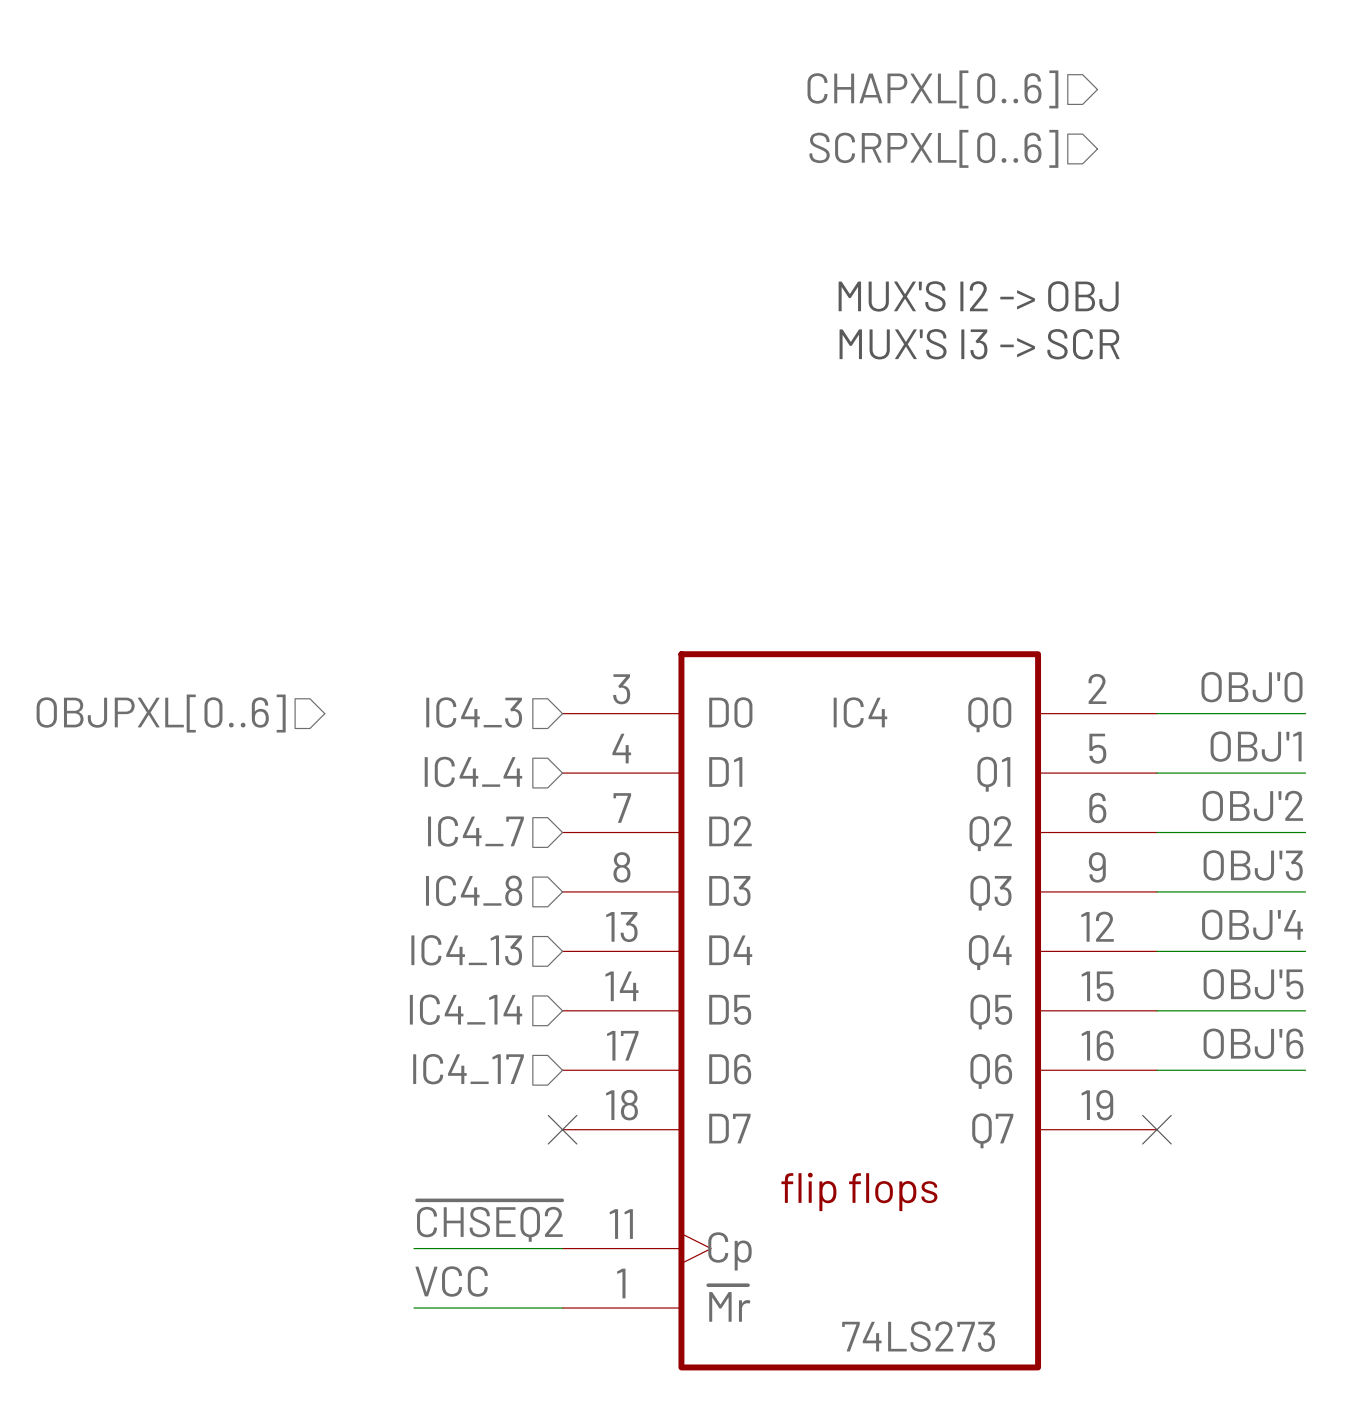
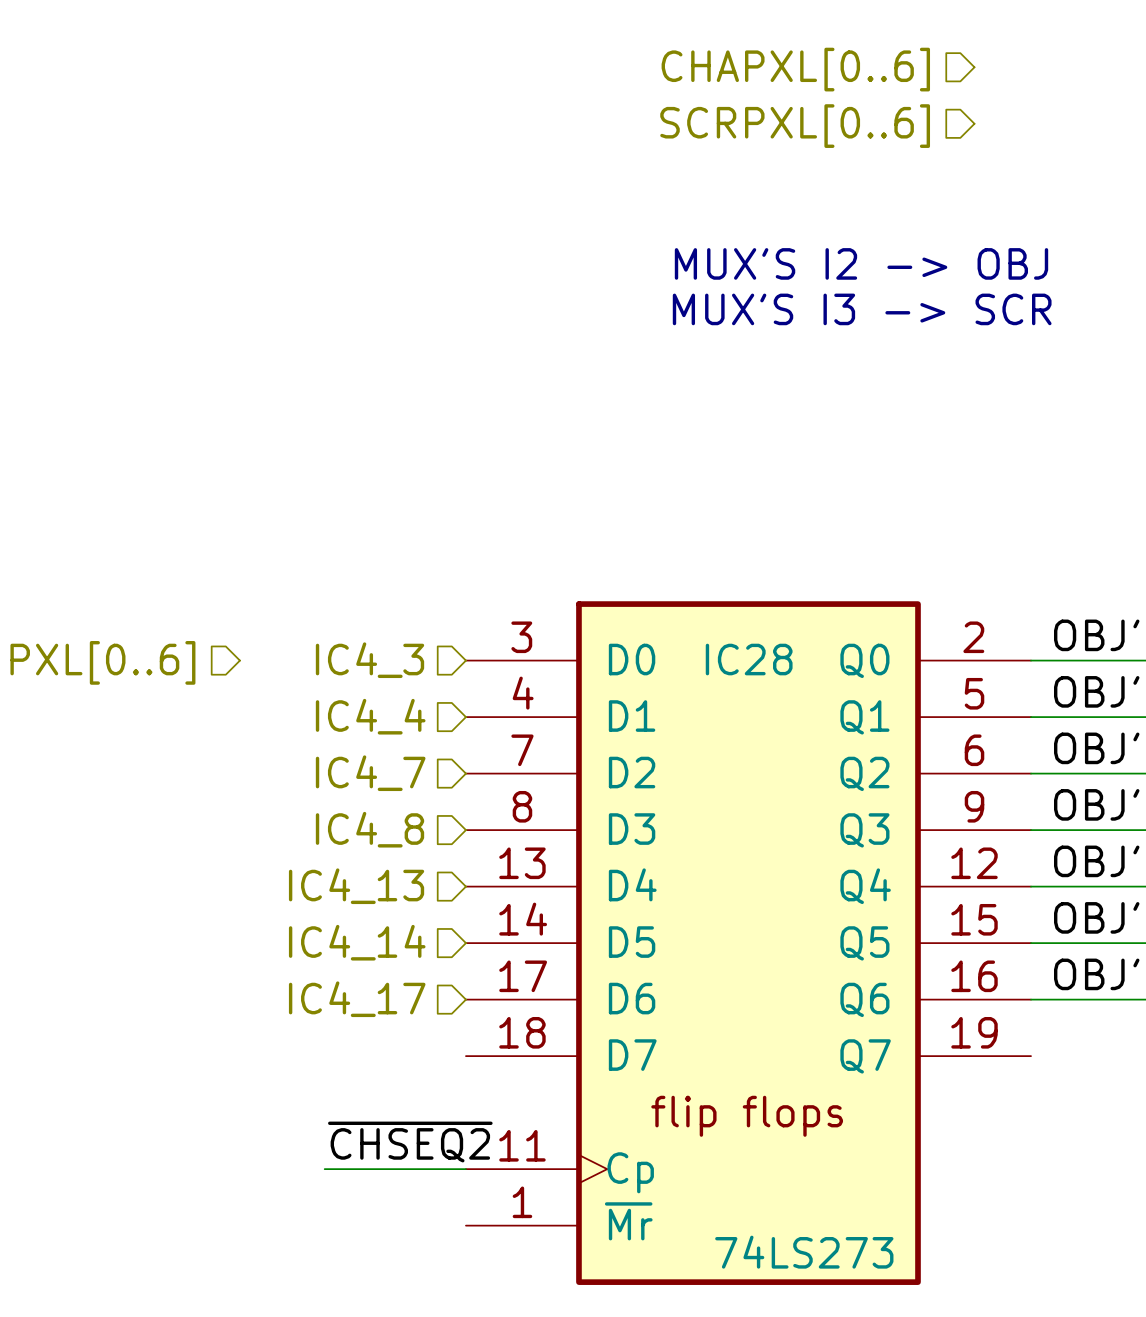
IC4 name: IC4 (860, 712) -> IC28 (749, 659)
no-connect mark: (562, 1129) -> none
no-connect mark: (1156, 1129) -> none
label: VCC (451, 1281) -> none
wire: (413, 1308) (562, 1308) -> none

